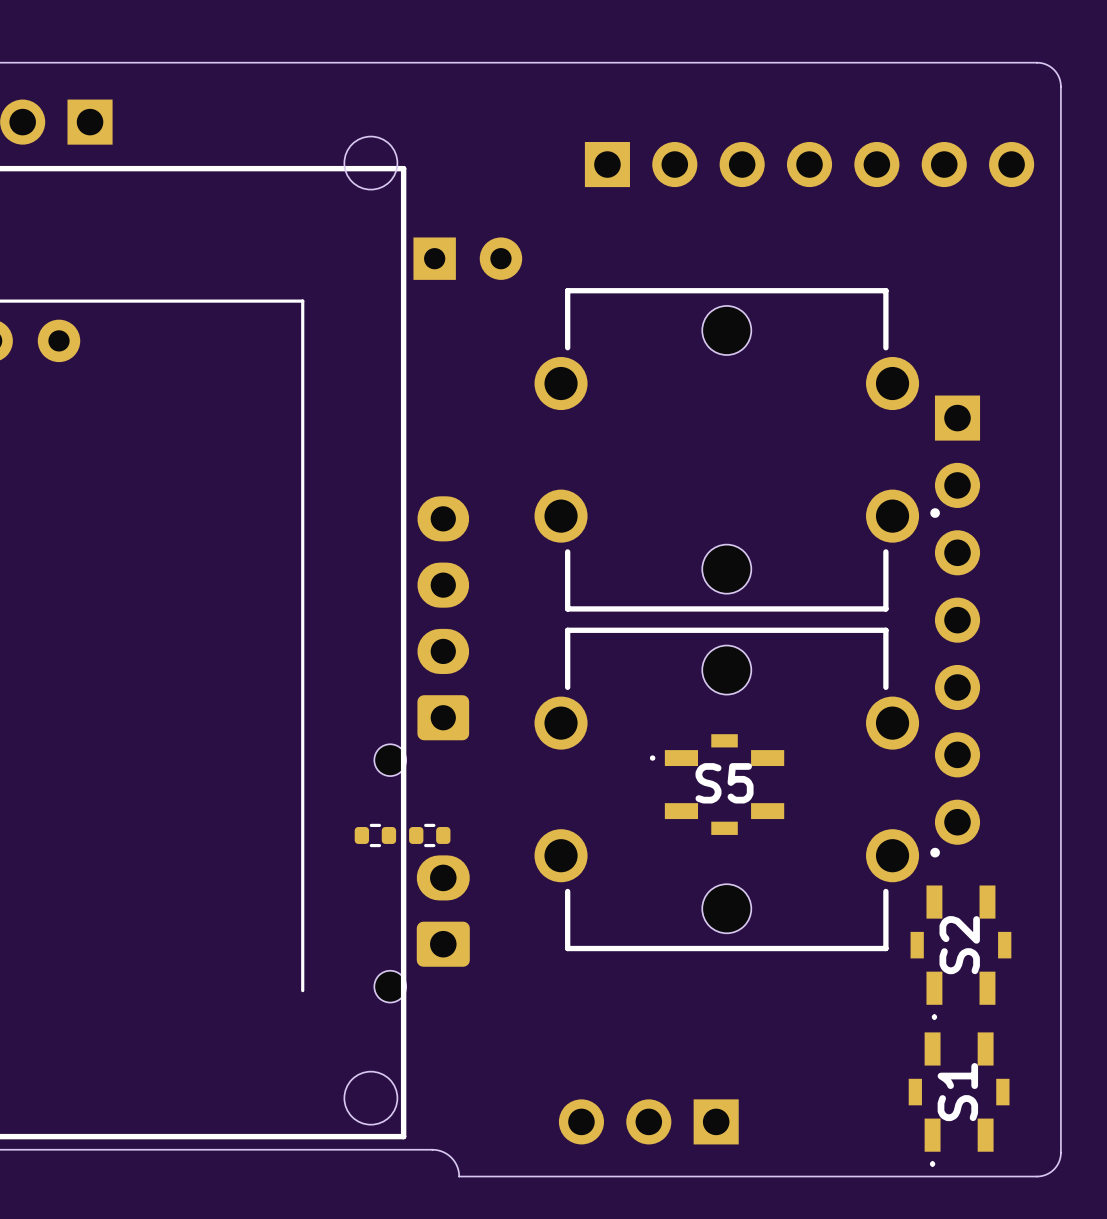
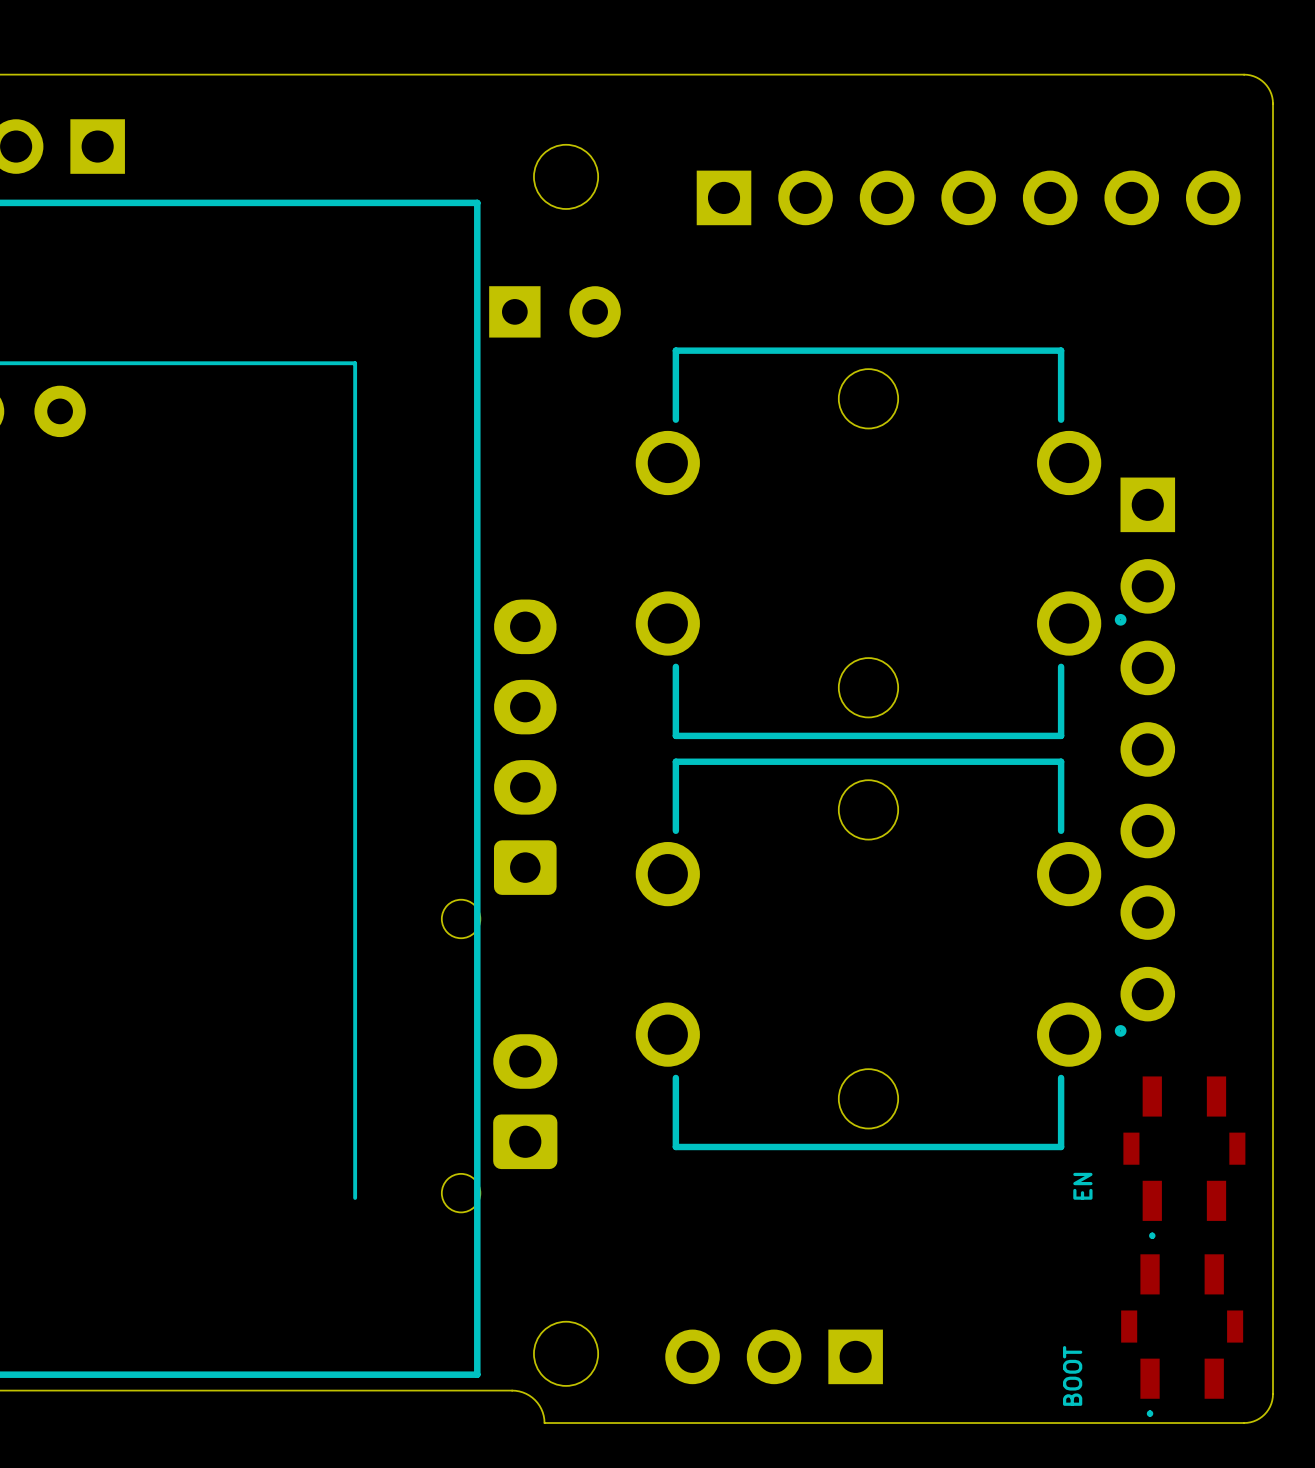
round board edge position: (370, 163) -> (566, 176)
S5: (717, 784) -> none
part: (375, 835) -> none
part: (429, 835) -> none
S2: (960, 952) -> none
part: none -> (1184, 1157)
text: none -> EN (1082, 1186)
round board edge position: (370, 1098) -> (566, 1353)
S1: (959, 1099) -> none
part: none -> (1182, 1335)
text: none -> BOOT (1072, 1375)

